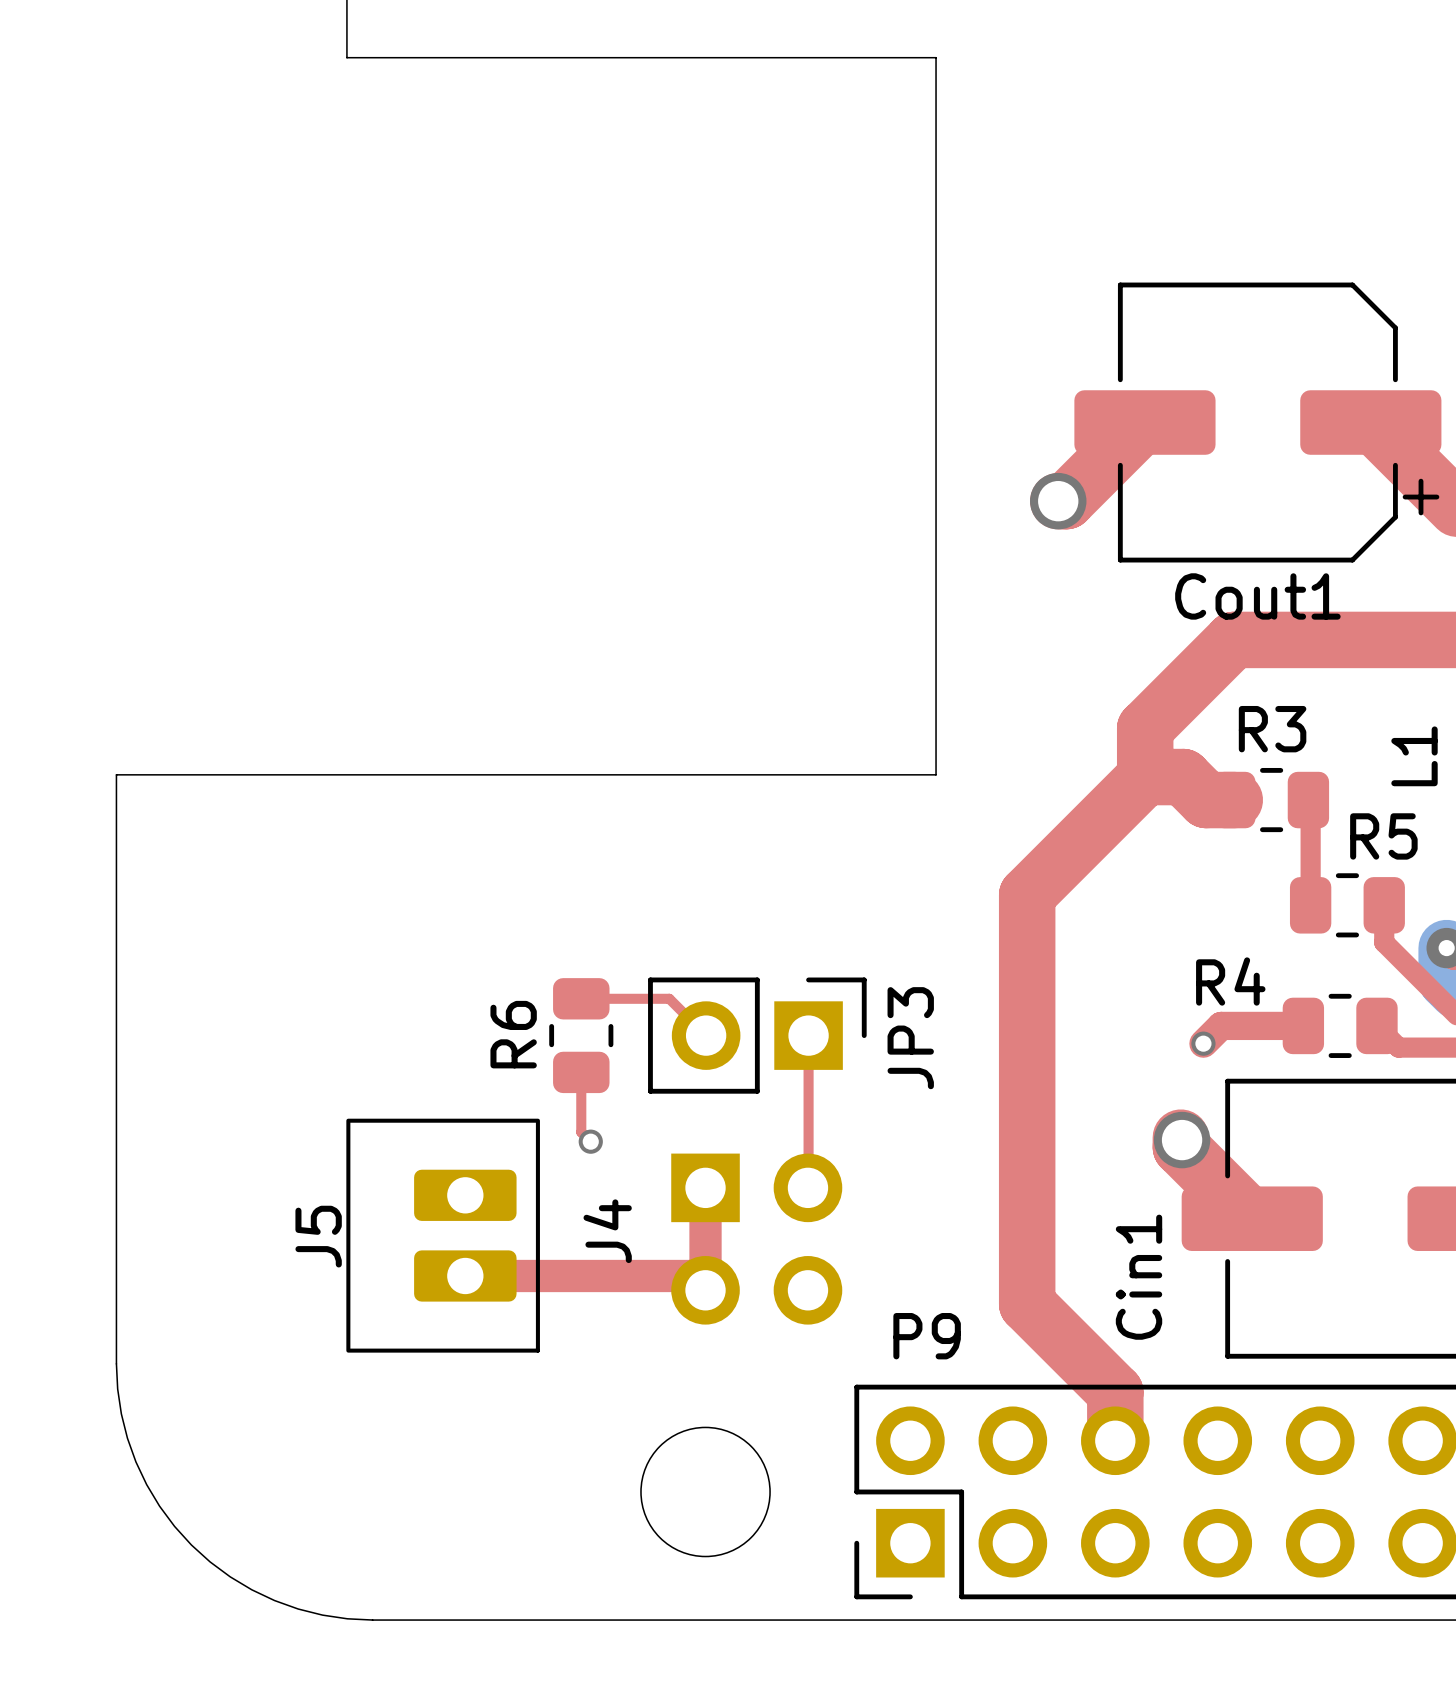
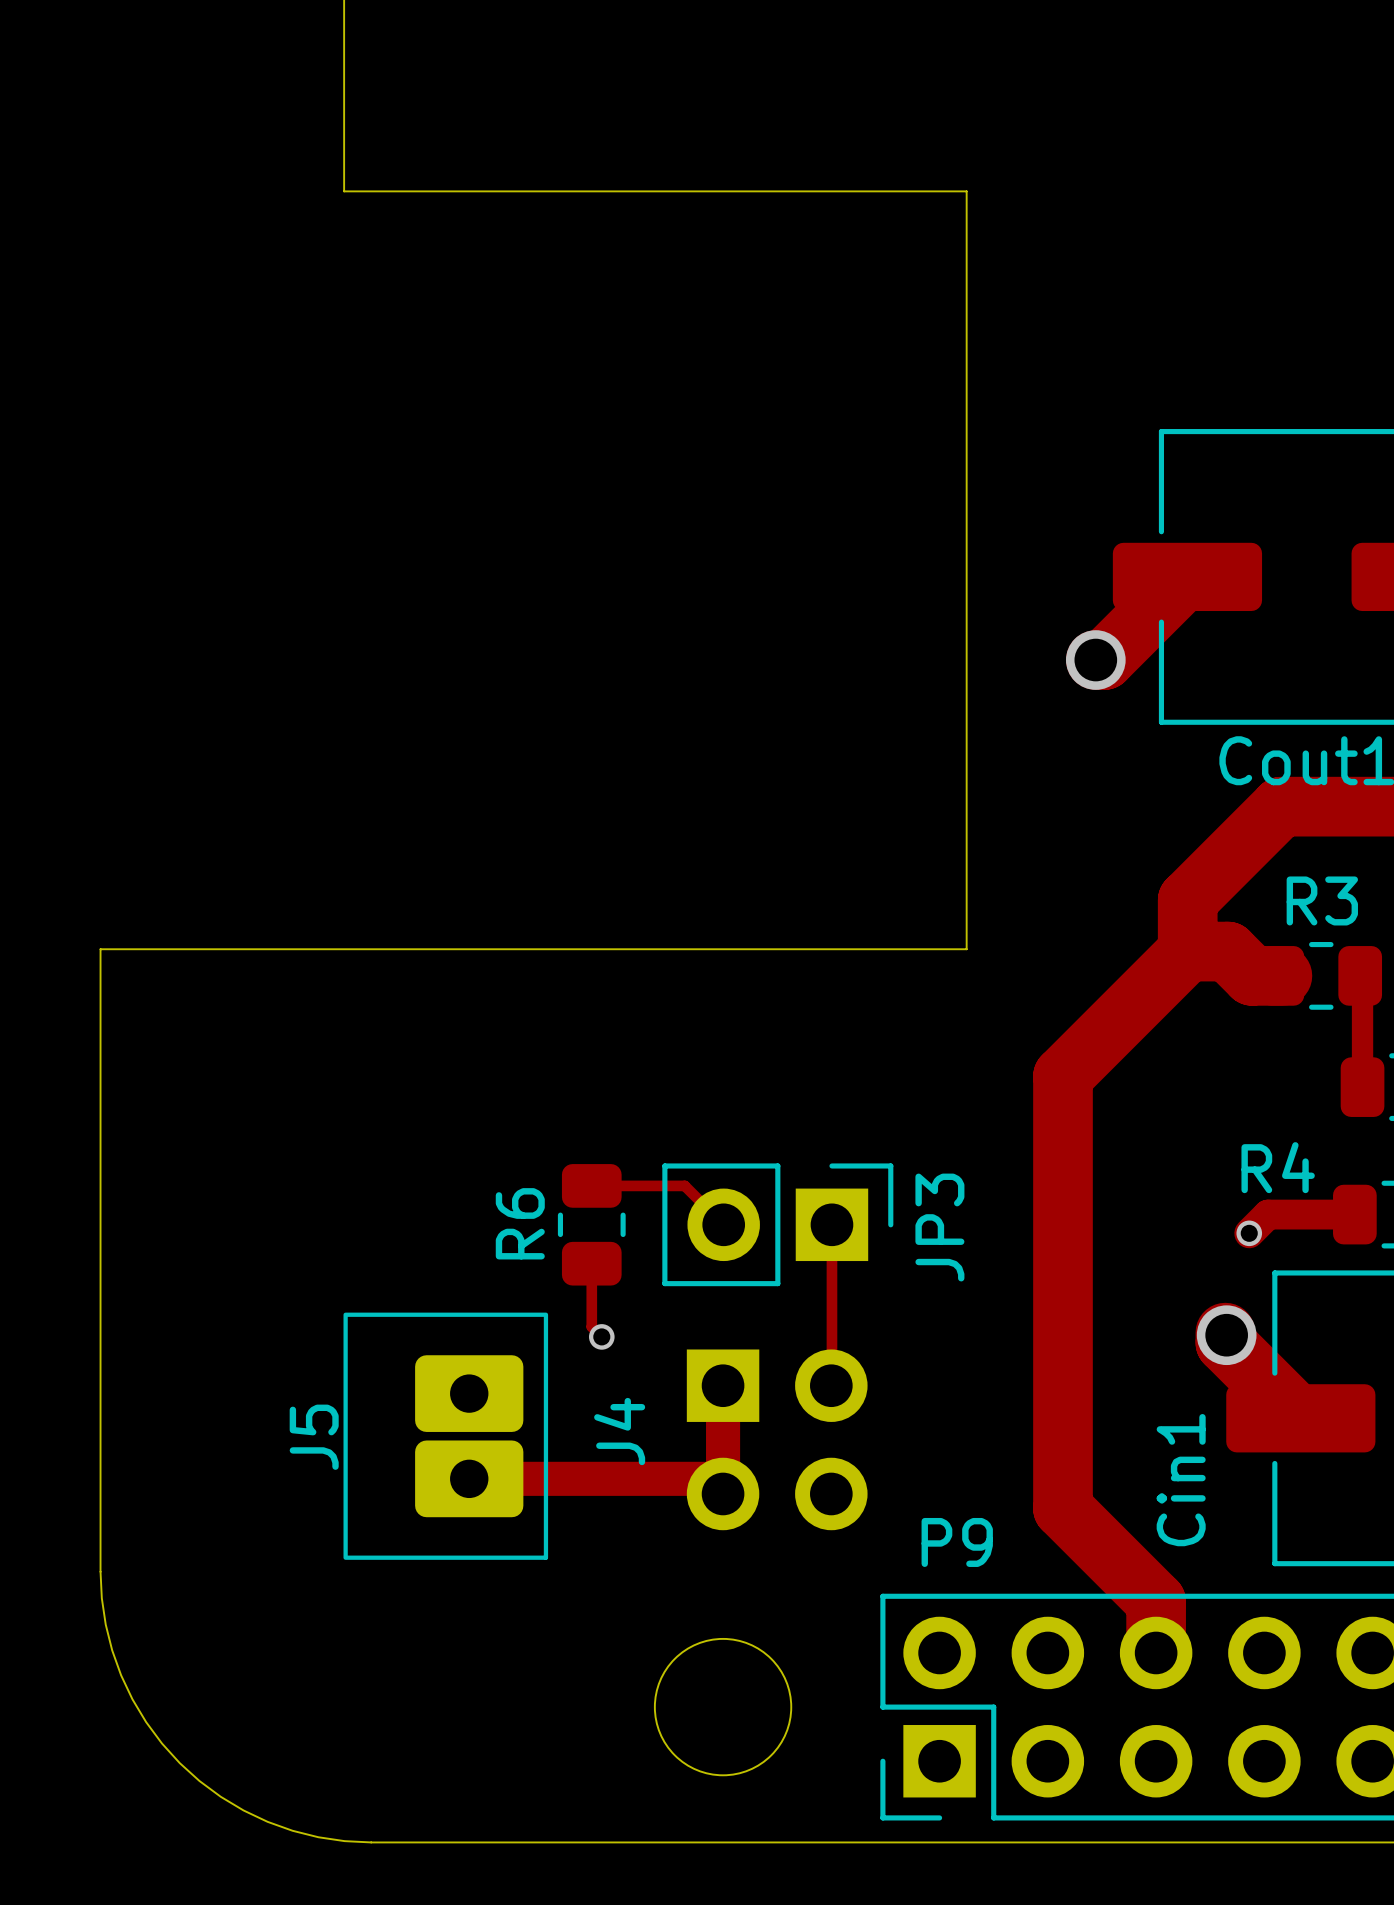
J5 footprint: [346, 1118, 540, 1353] -> [343, 1312, 549, 1560]

